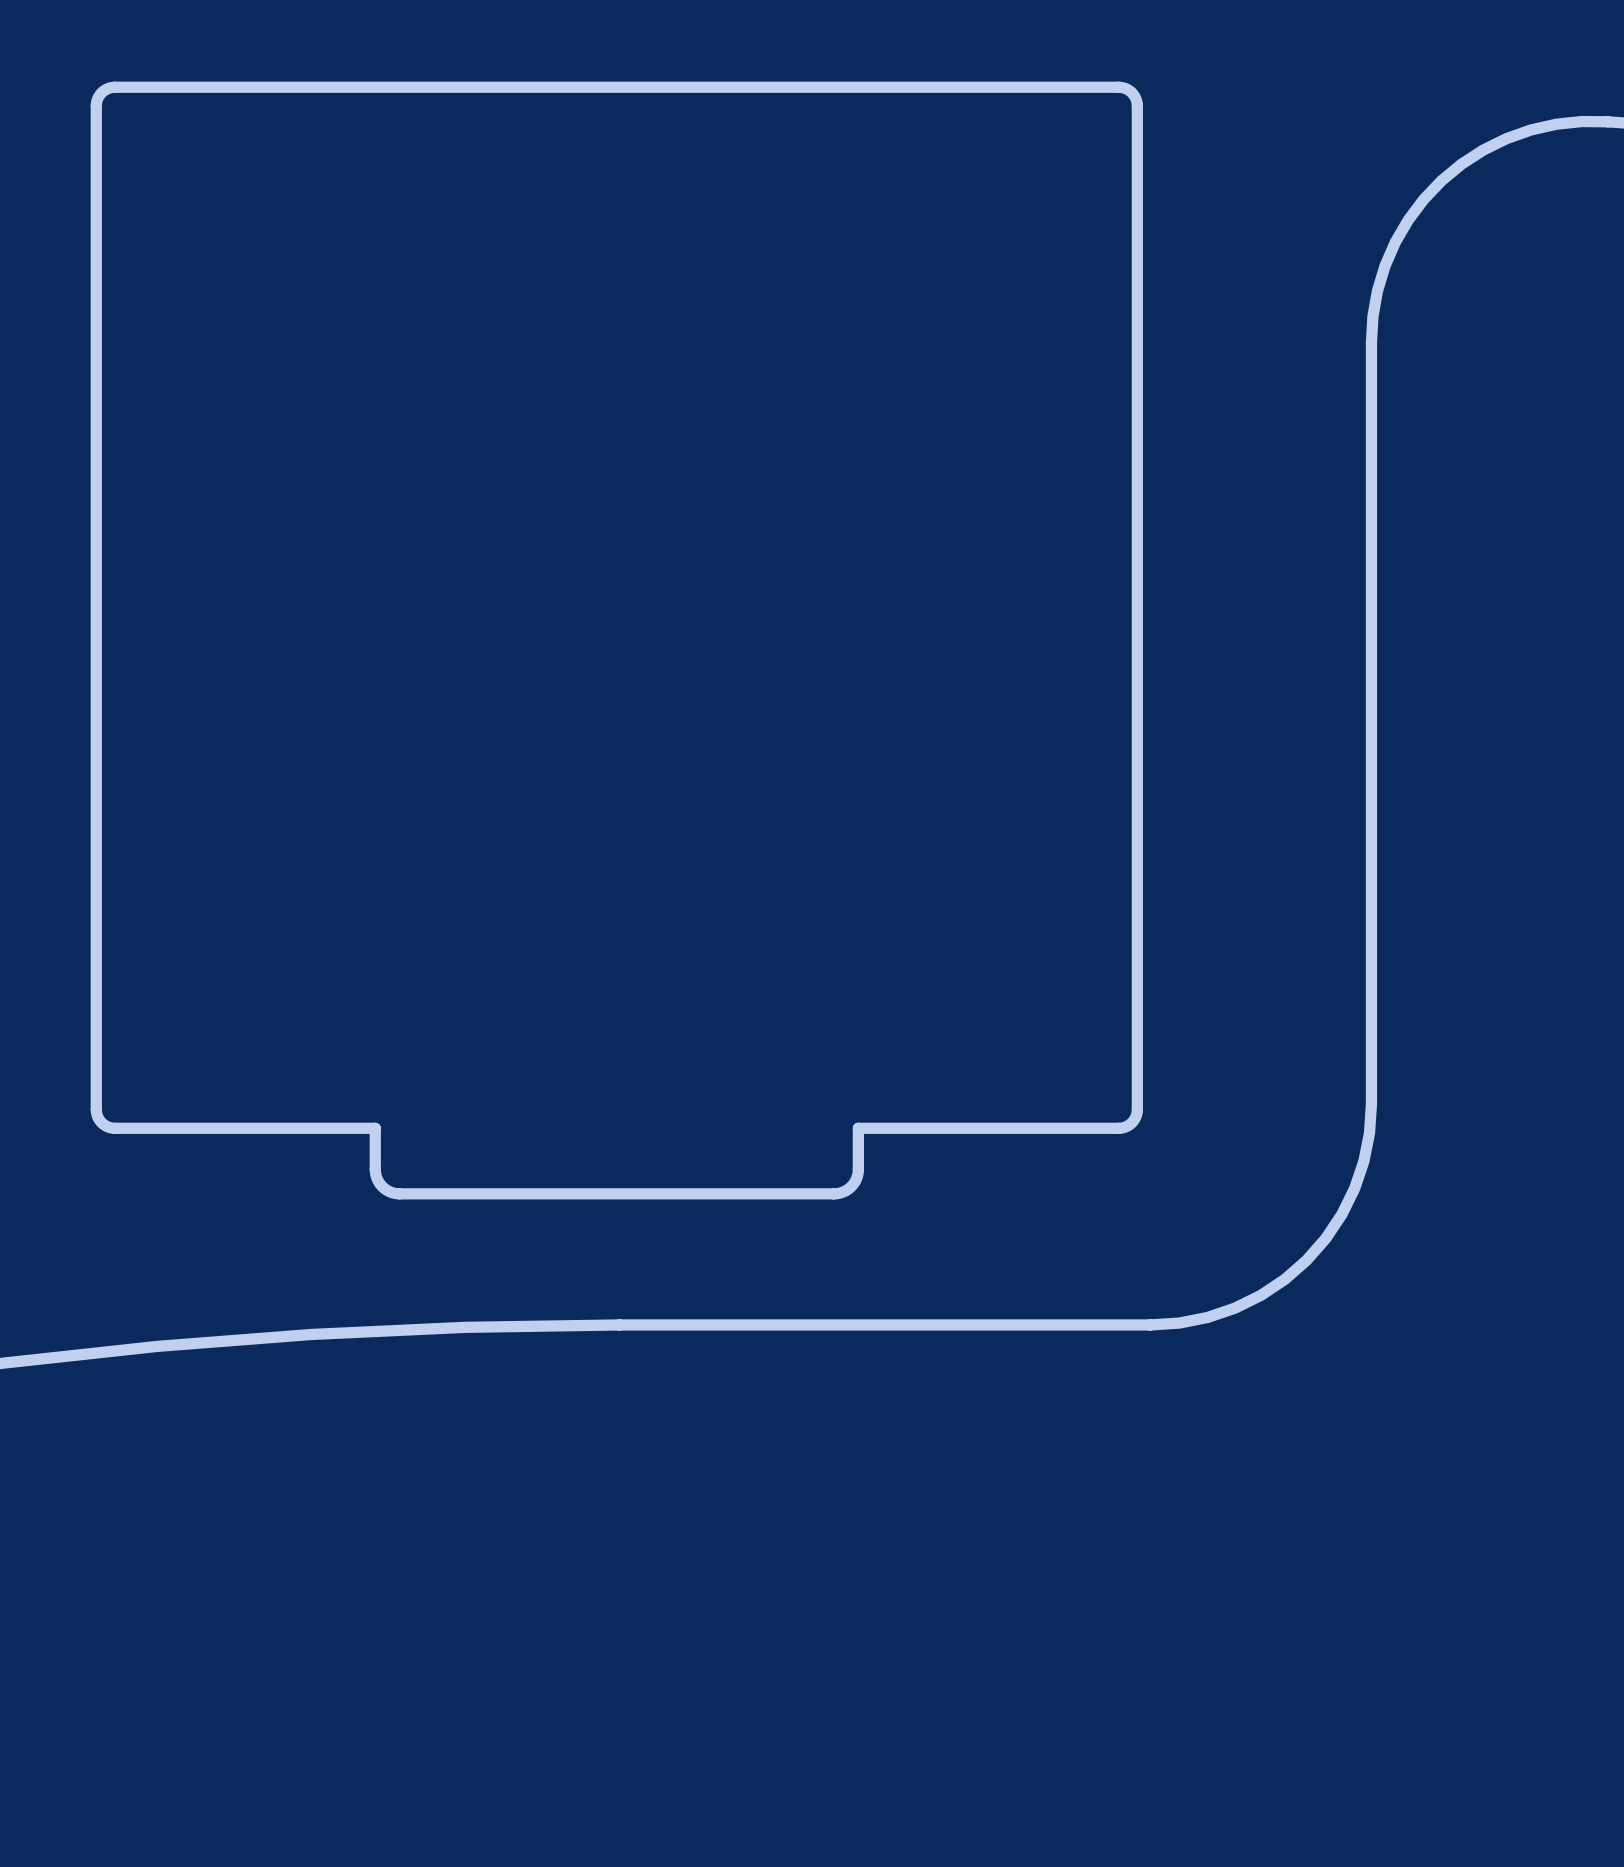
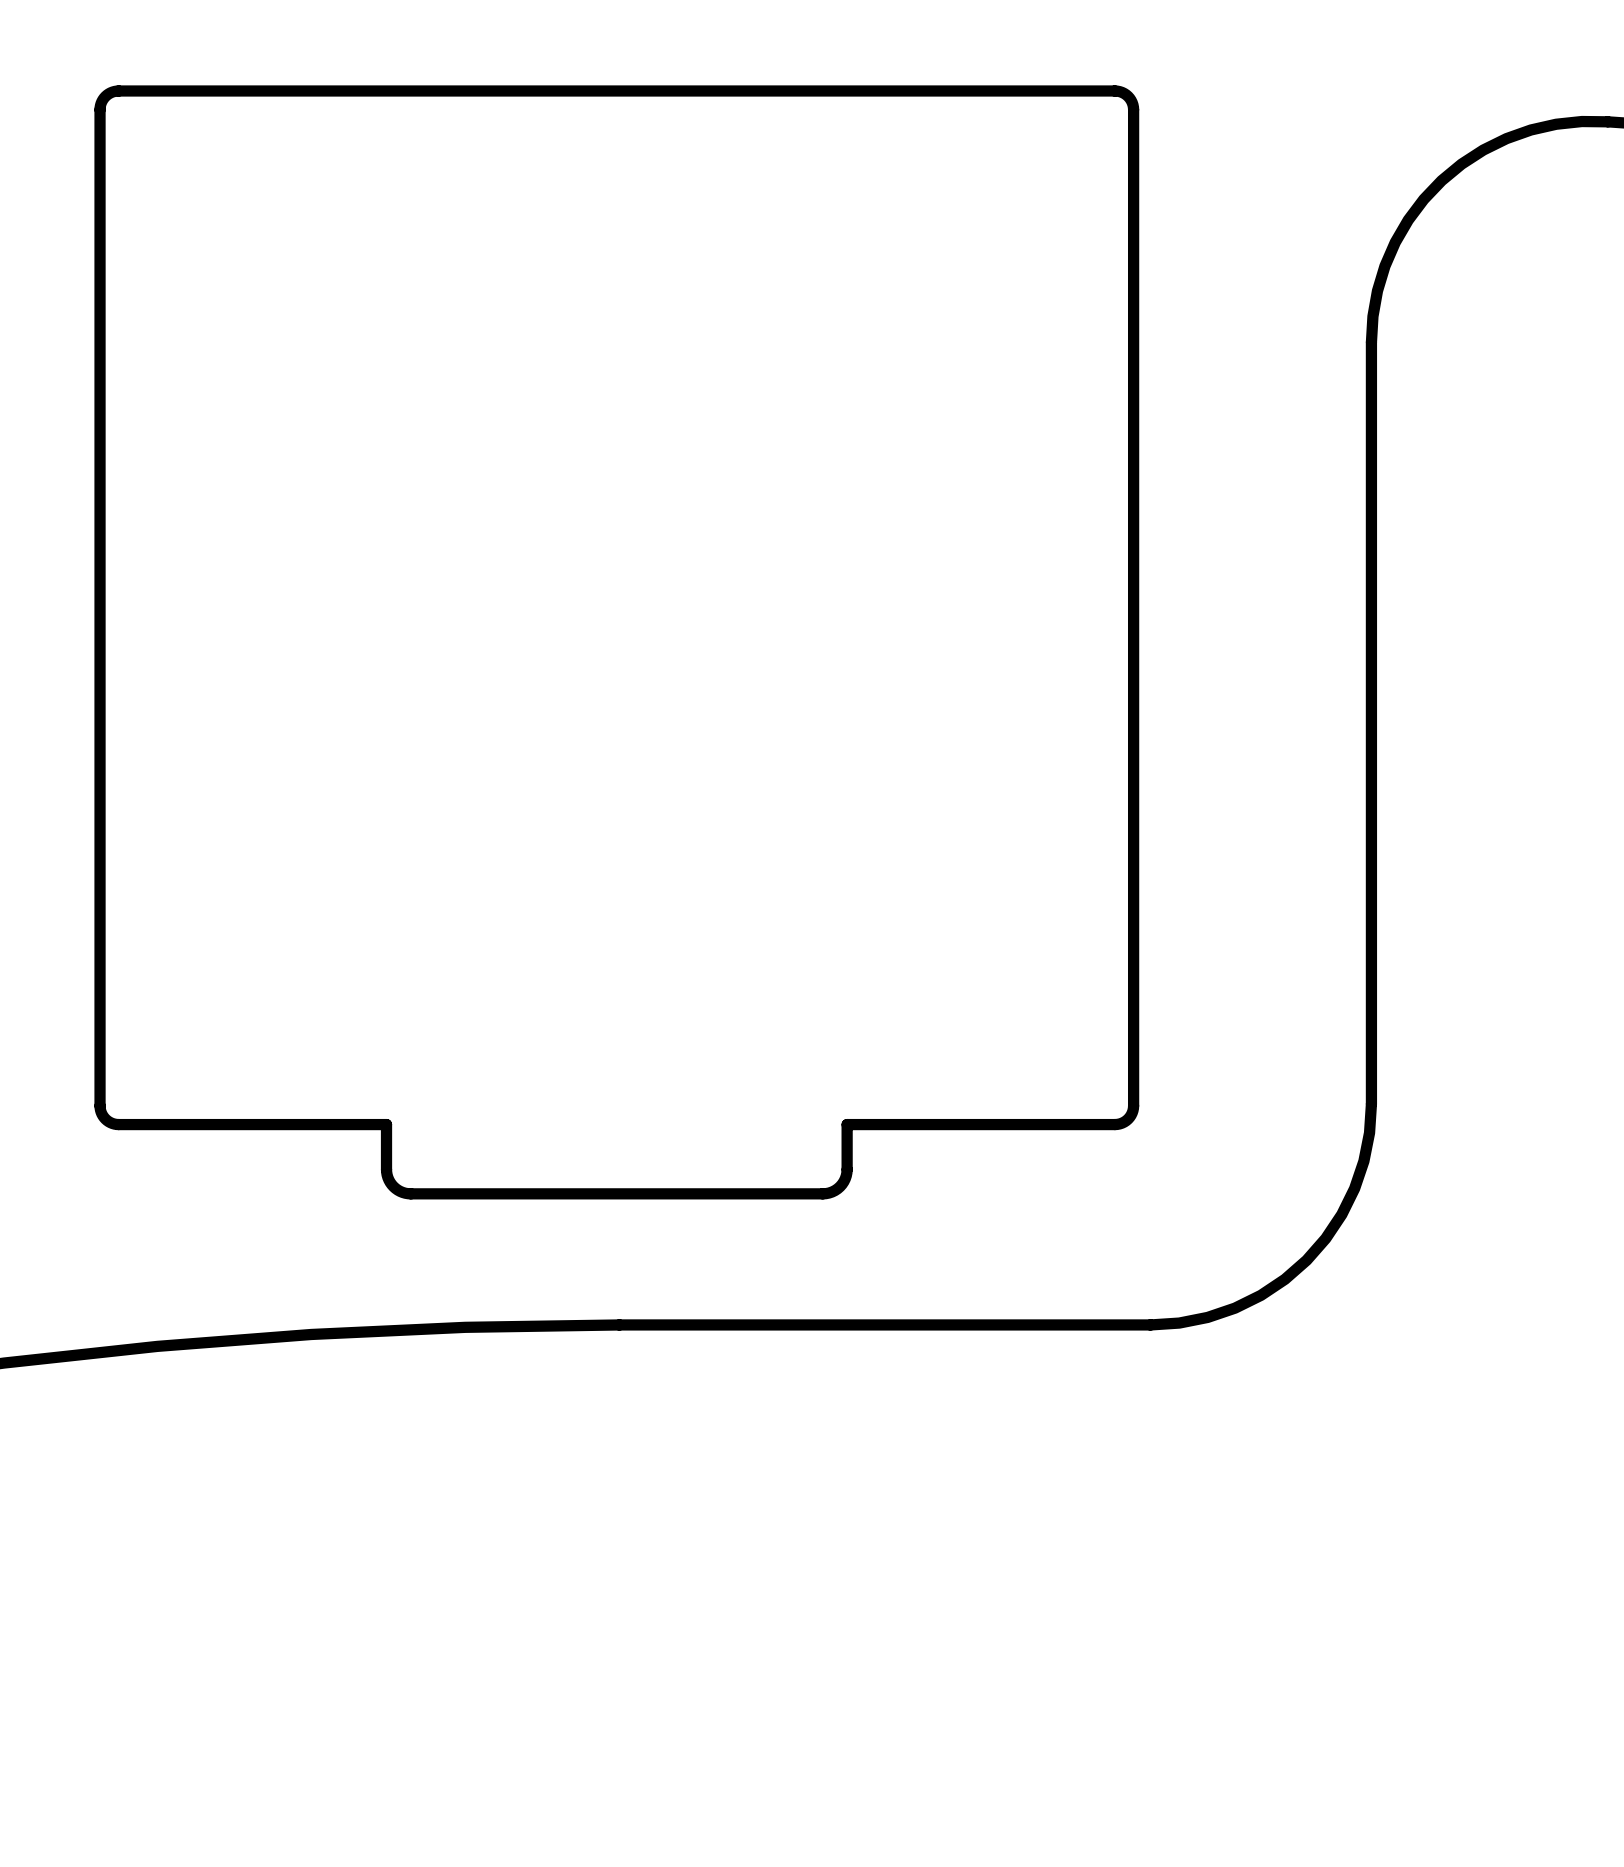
board edge: (822, 1193) (843, 1191) (855, 1181) (858, 1169) (858, 1128) (1118, 1128) (1130, 1124) (1136, 1114) (1137, 105) (1133, 94) (1123, 87) (115, 87) (106, 89) (99, 96) (96, 105) (96, 1113) (103, 1124) (115, 1128) (375, 1128) (375, 1169) (377, 1180) (389, 1191) (410, 1193) -> (822, 1193) (834, 1190) (845, 1178) (847, 1169) (847, 1124) (1114, 1124) (1126, 1120) (1132, 1110) (1133, 109) (1129, 98) (1119, 91) (118, 90) (110, 92) (102, 99) (100, 109) (100, 1110) (107, 1120) (118, 1124) (386, 1124) (387, 1177) (395, 1188) (410, 1193)

